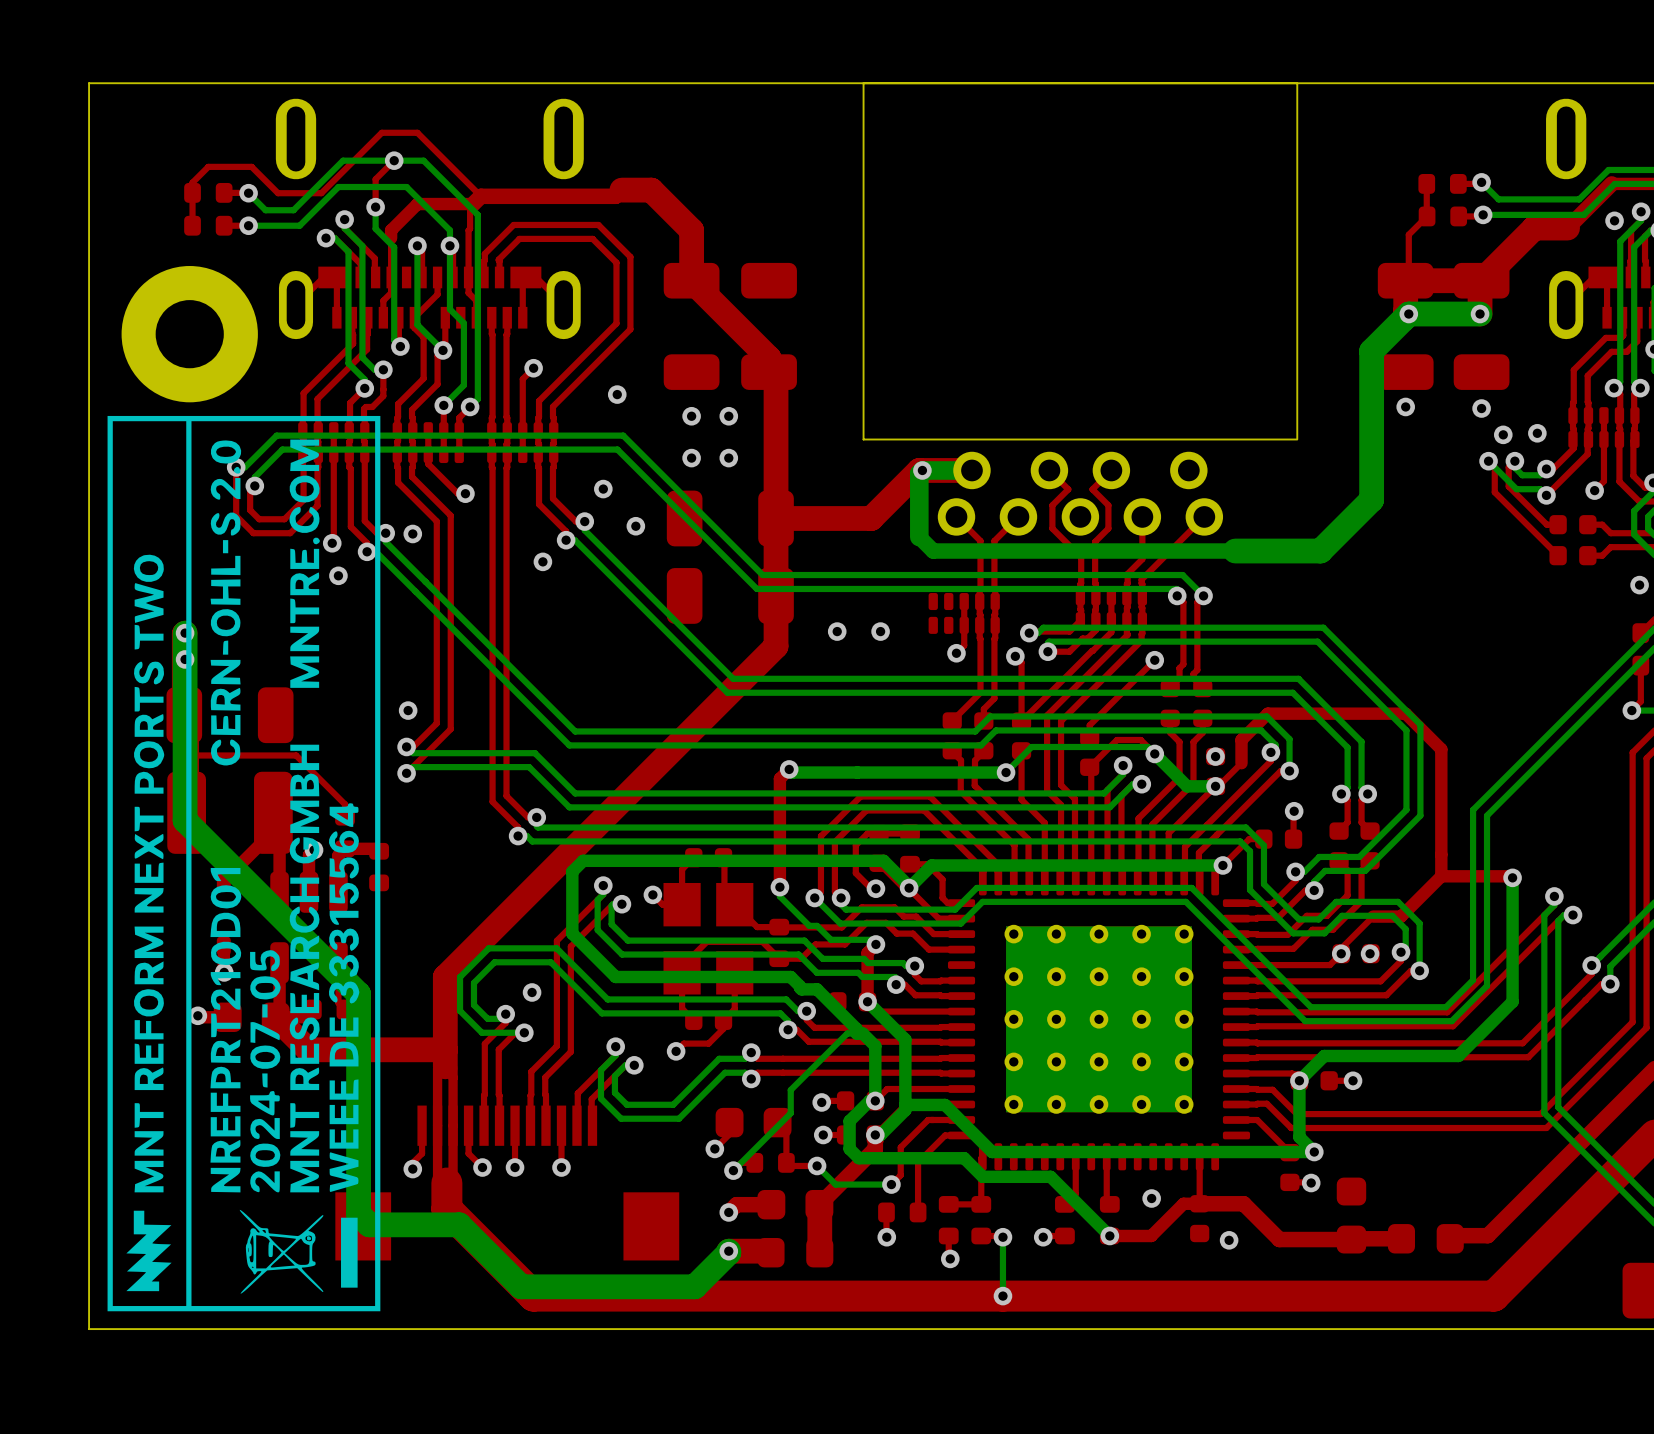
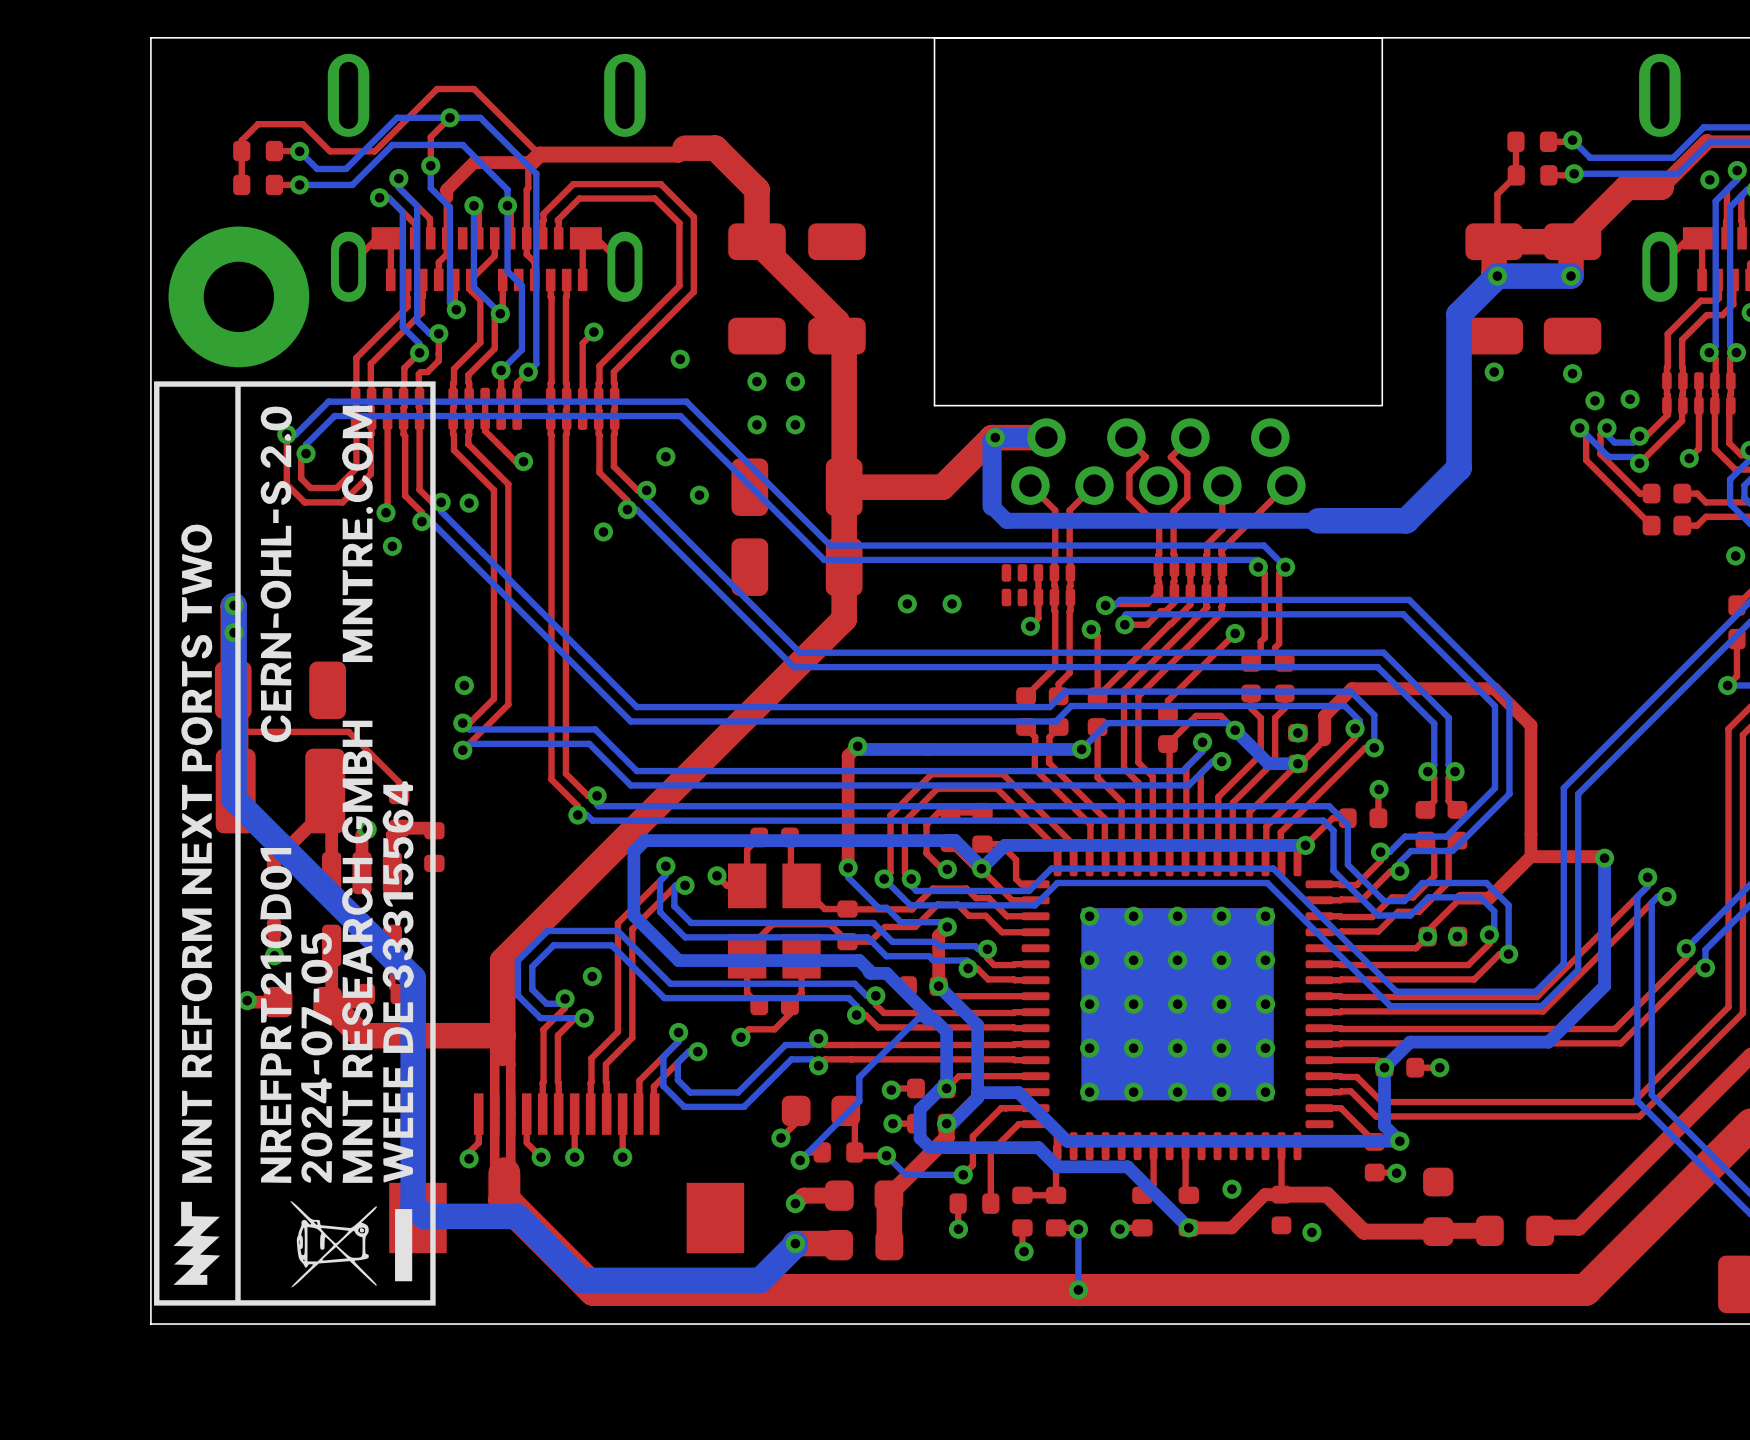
board edge: (104, 83) (89, 83) (89, 1329) (104, 1329) -> (150, 37) (150, 1324)

